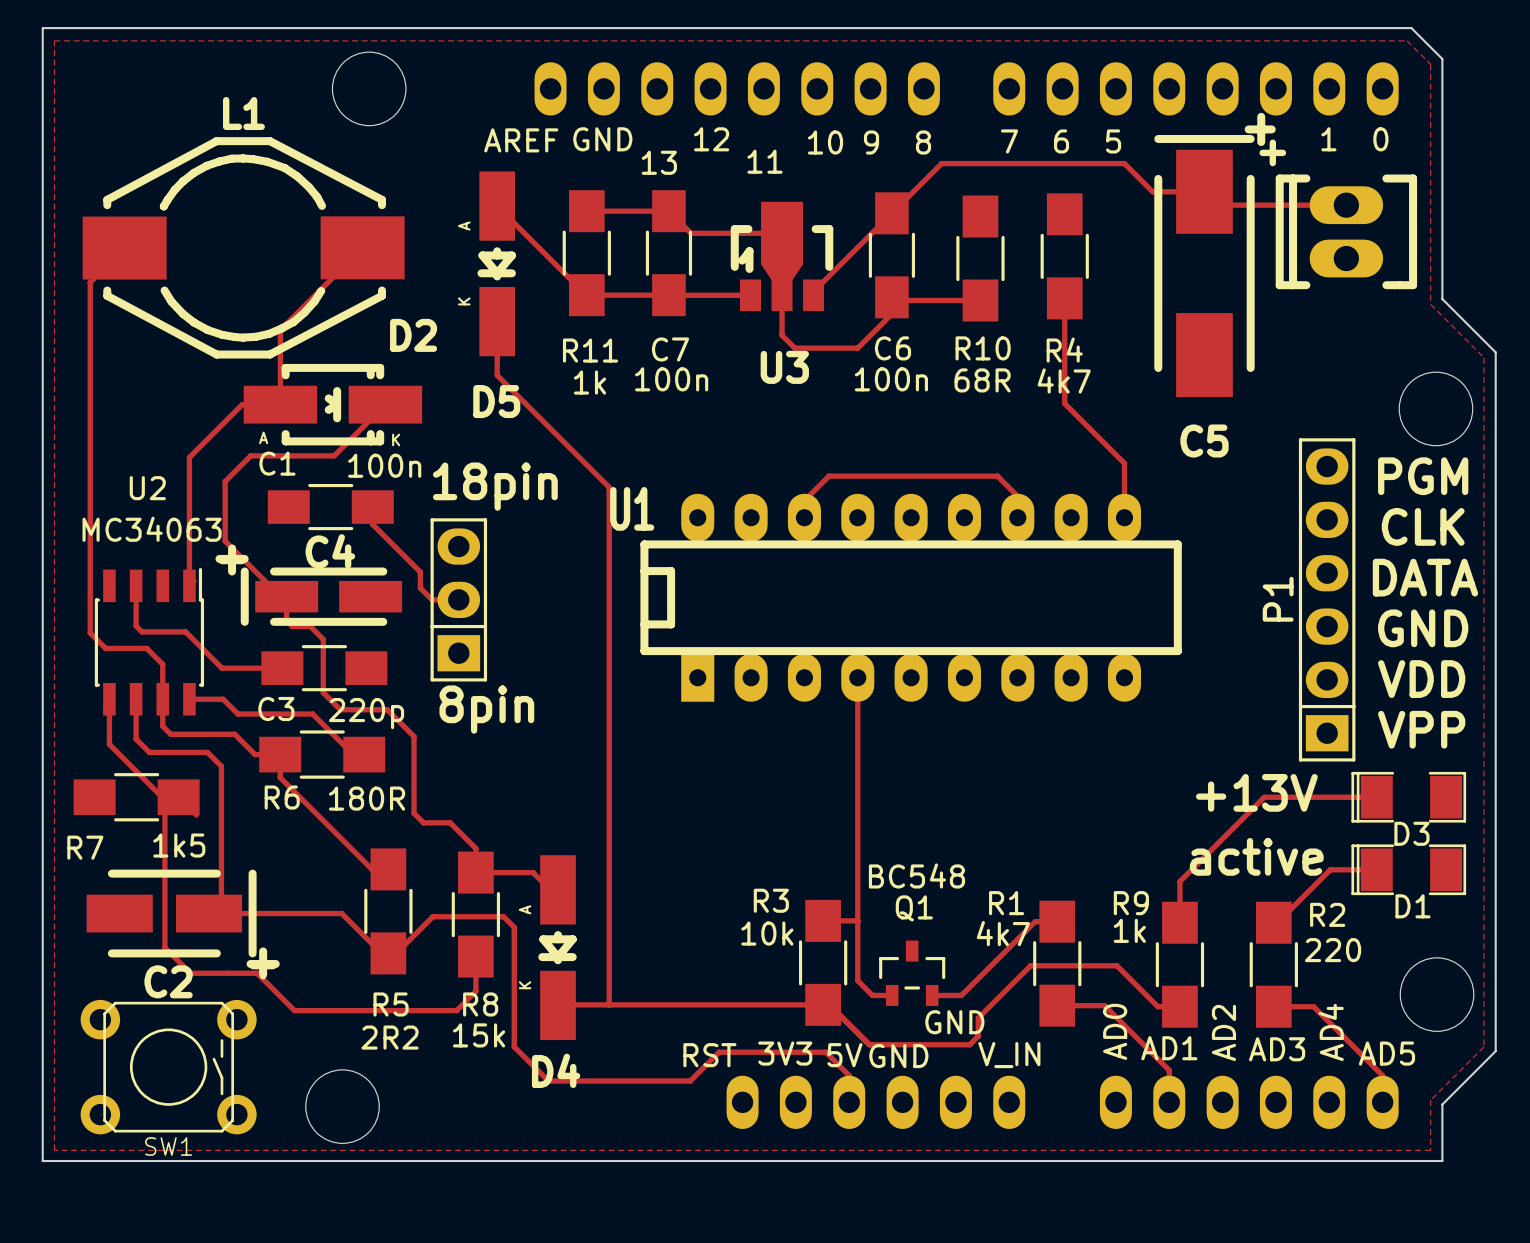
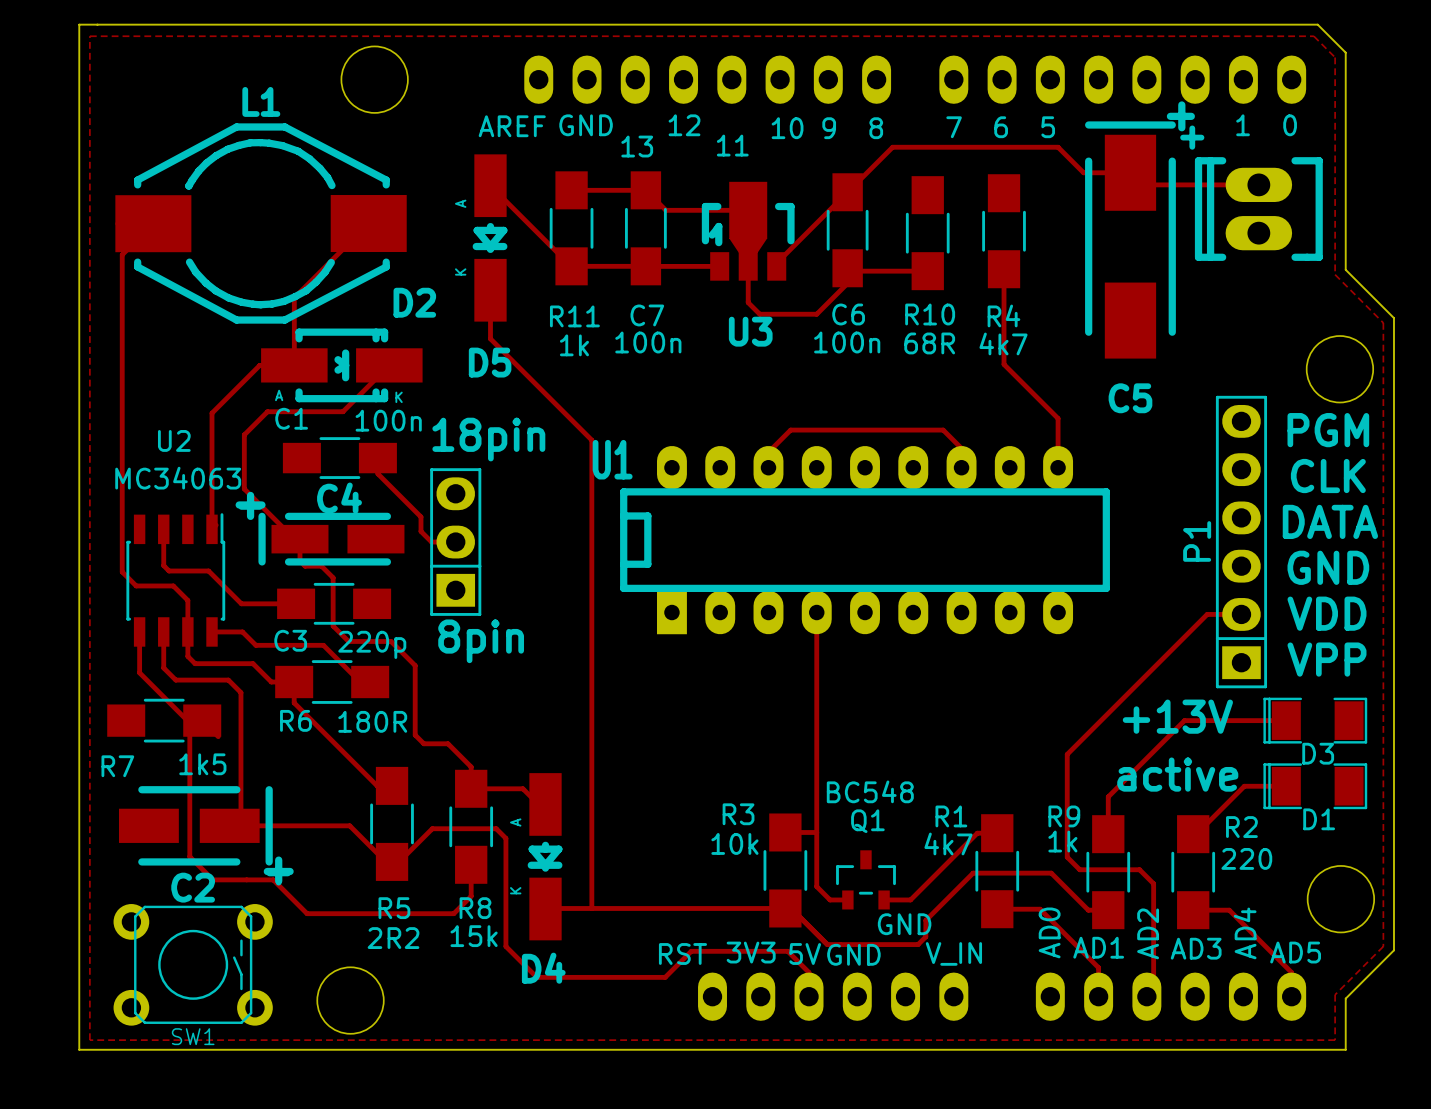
track: none -> (1241, 614) (1207, 614) (1067, 754) (1067, 857) (1079, 869) (1139, 869) (1153, 883) (1153, 989) (1146, 996)

